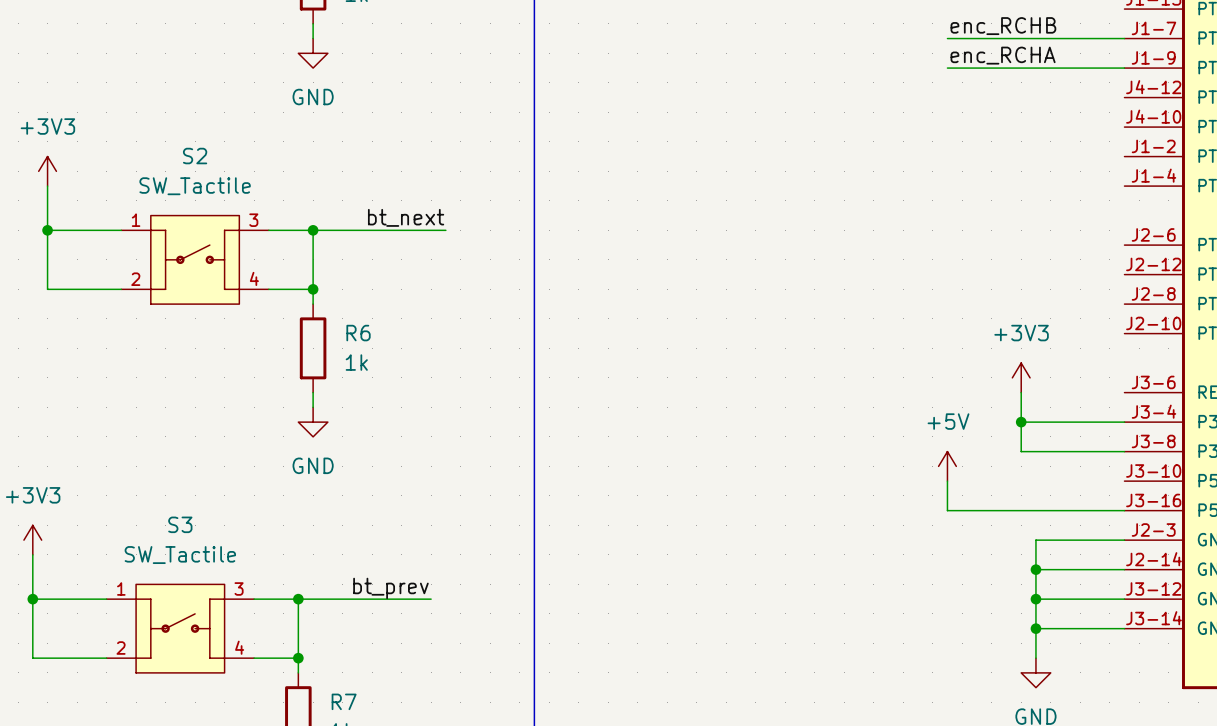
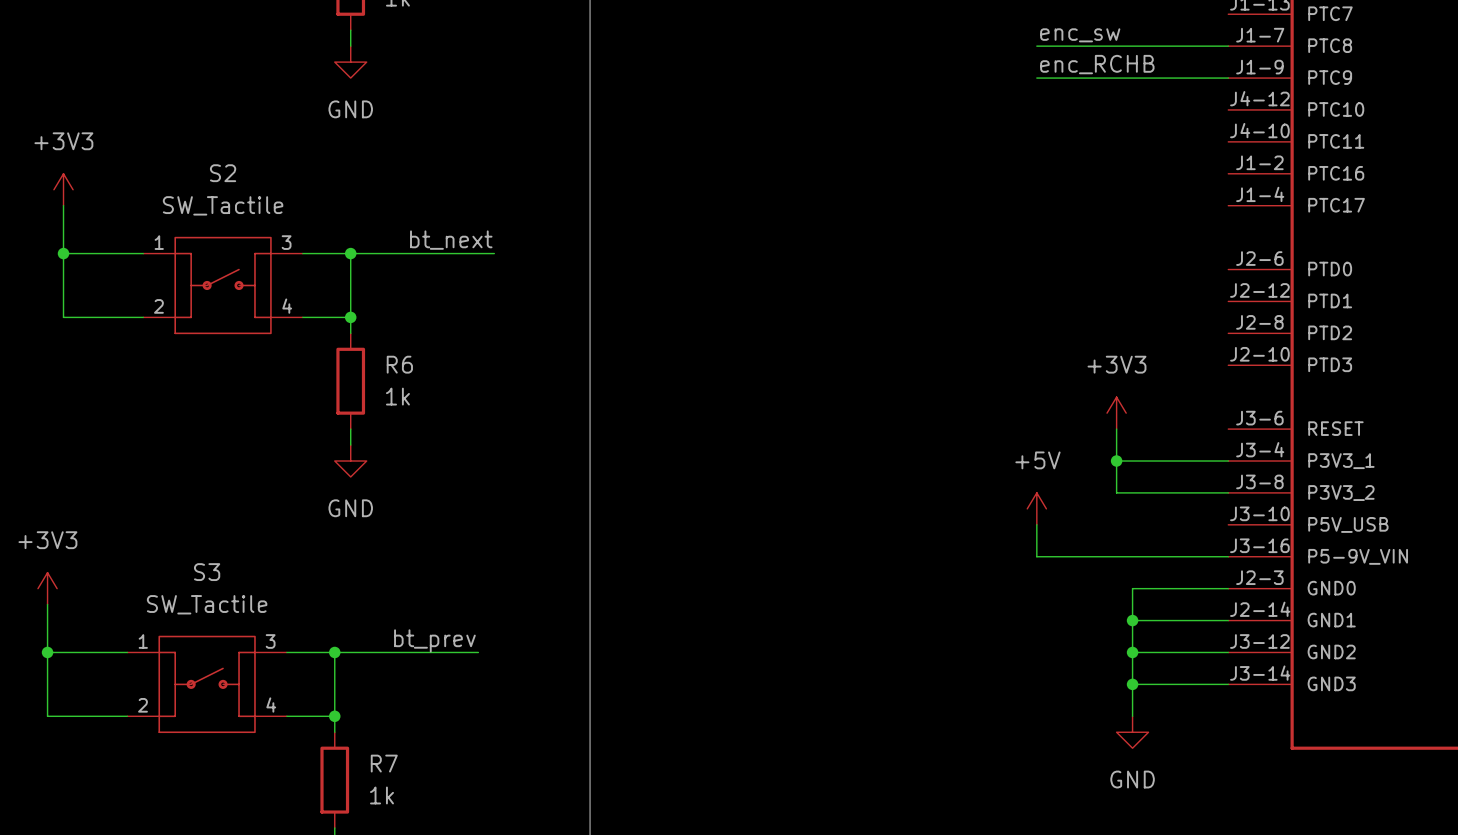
label: enc_RCHB (1003, 26) -> enc_sw (1080, 35)
label: enc_RCHA (1003, 55) -> enc_RCHB (1097, 64)

